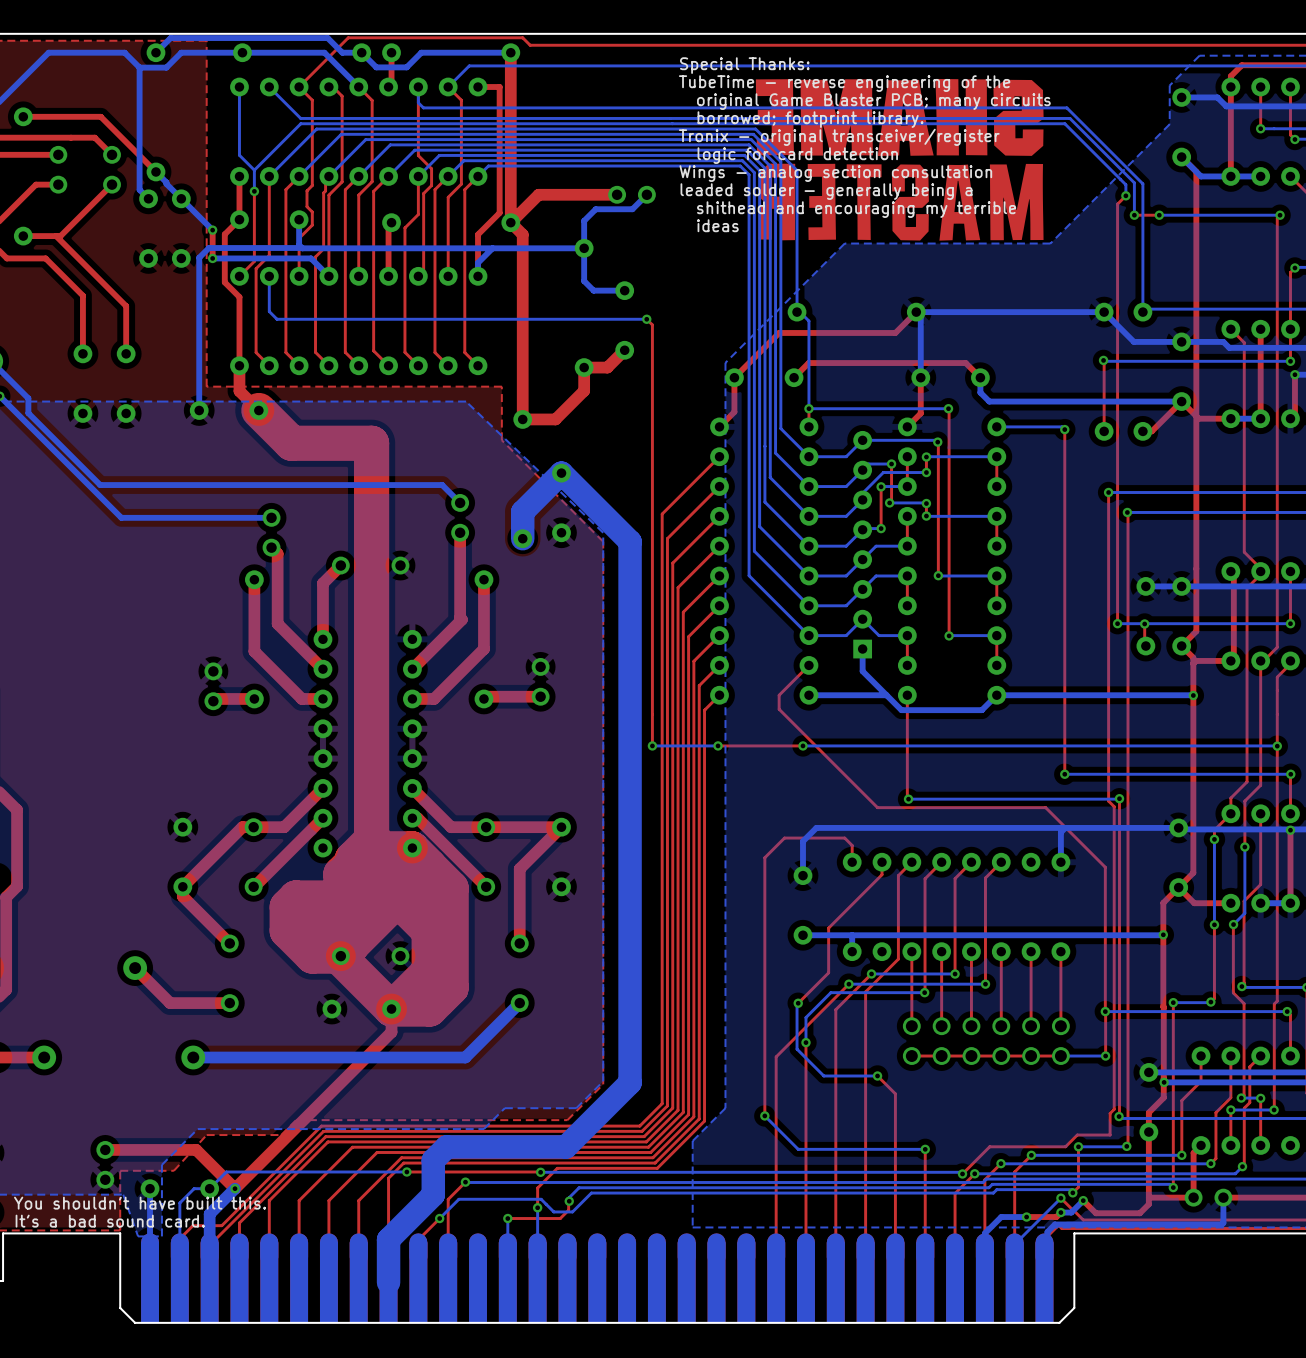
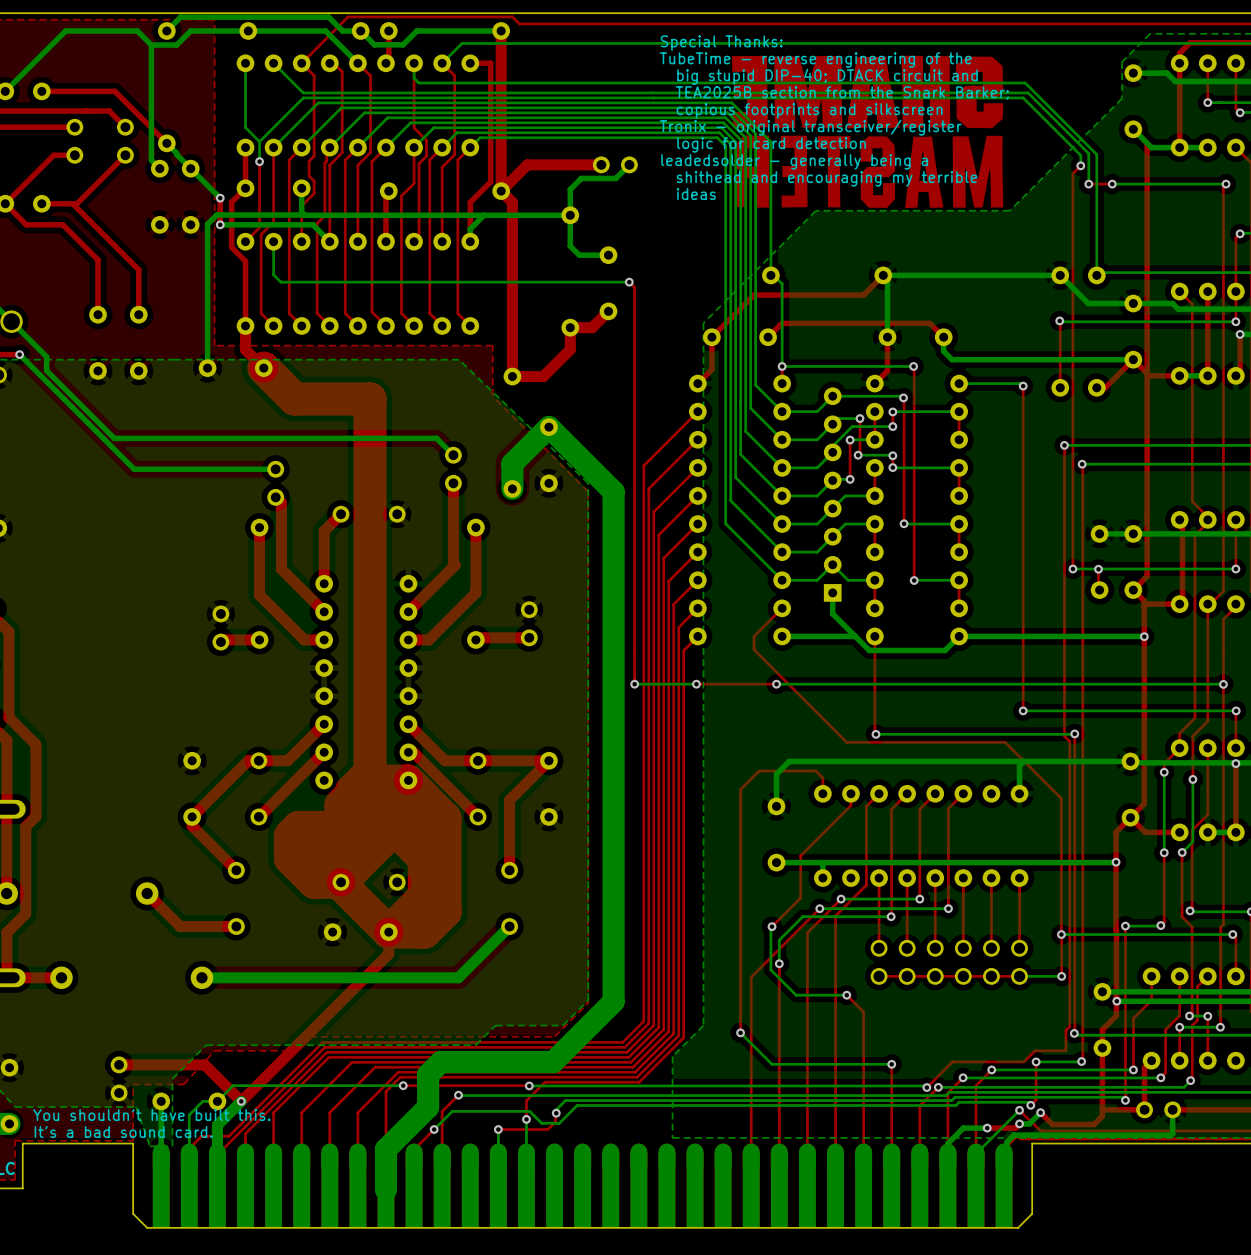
text: original Game Blaster PCB; many circuits (873, 101) -> big stupid DIP-40; DTACK circuit and (827, 76)
text: borrowed; footprint library. (810, 119) -> TEA2025B section from the Snark Barker; (842, 92)
text: Tronix - original transceiver/register (839, 137) -> copious footprints and silkscreen (809, 110)
text: logic for card detection (797, 155) -> Tronix - original transceiver/register (810, 127)
text: Wings - analog section consultation (835, 173) -> logic for card detection (771, 144)
text: leaded solder - generally being a (826, 191) -> leadedsolder - generally being a (794, 161)

